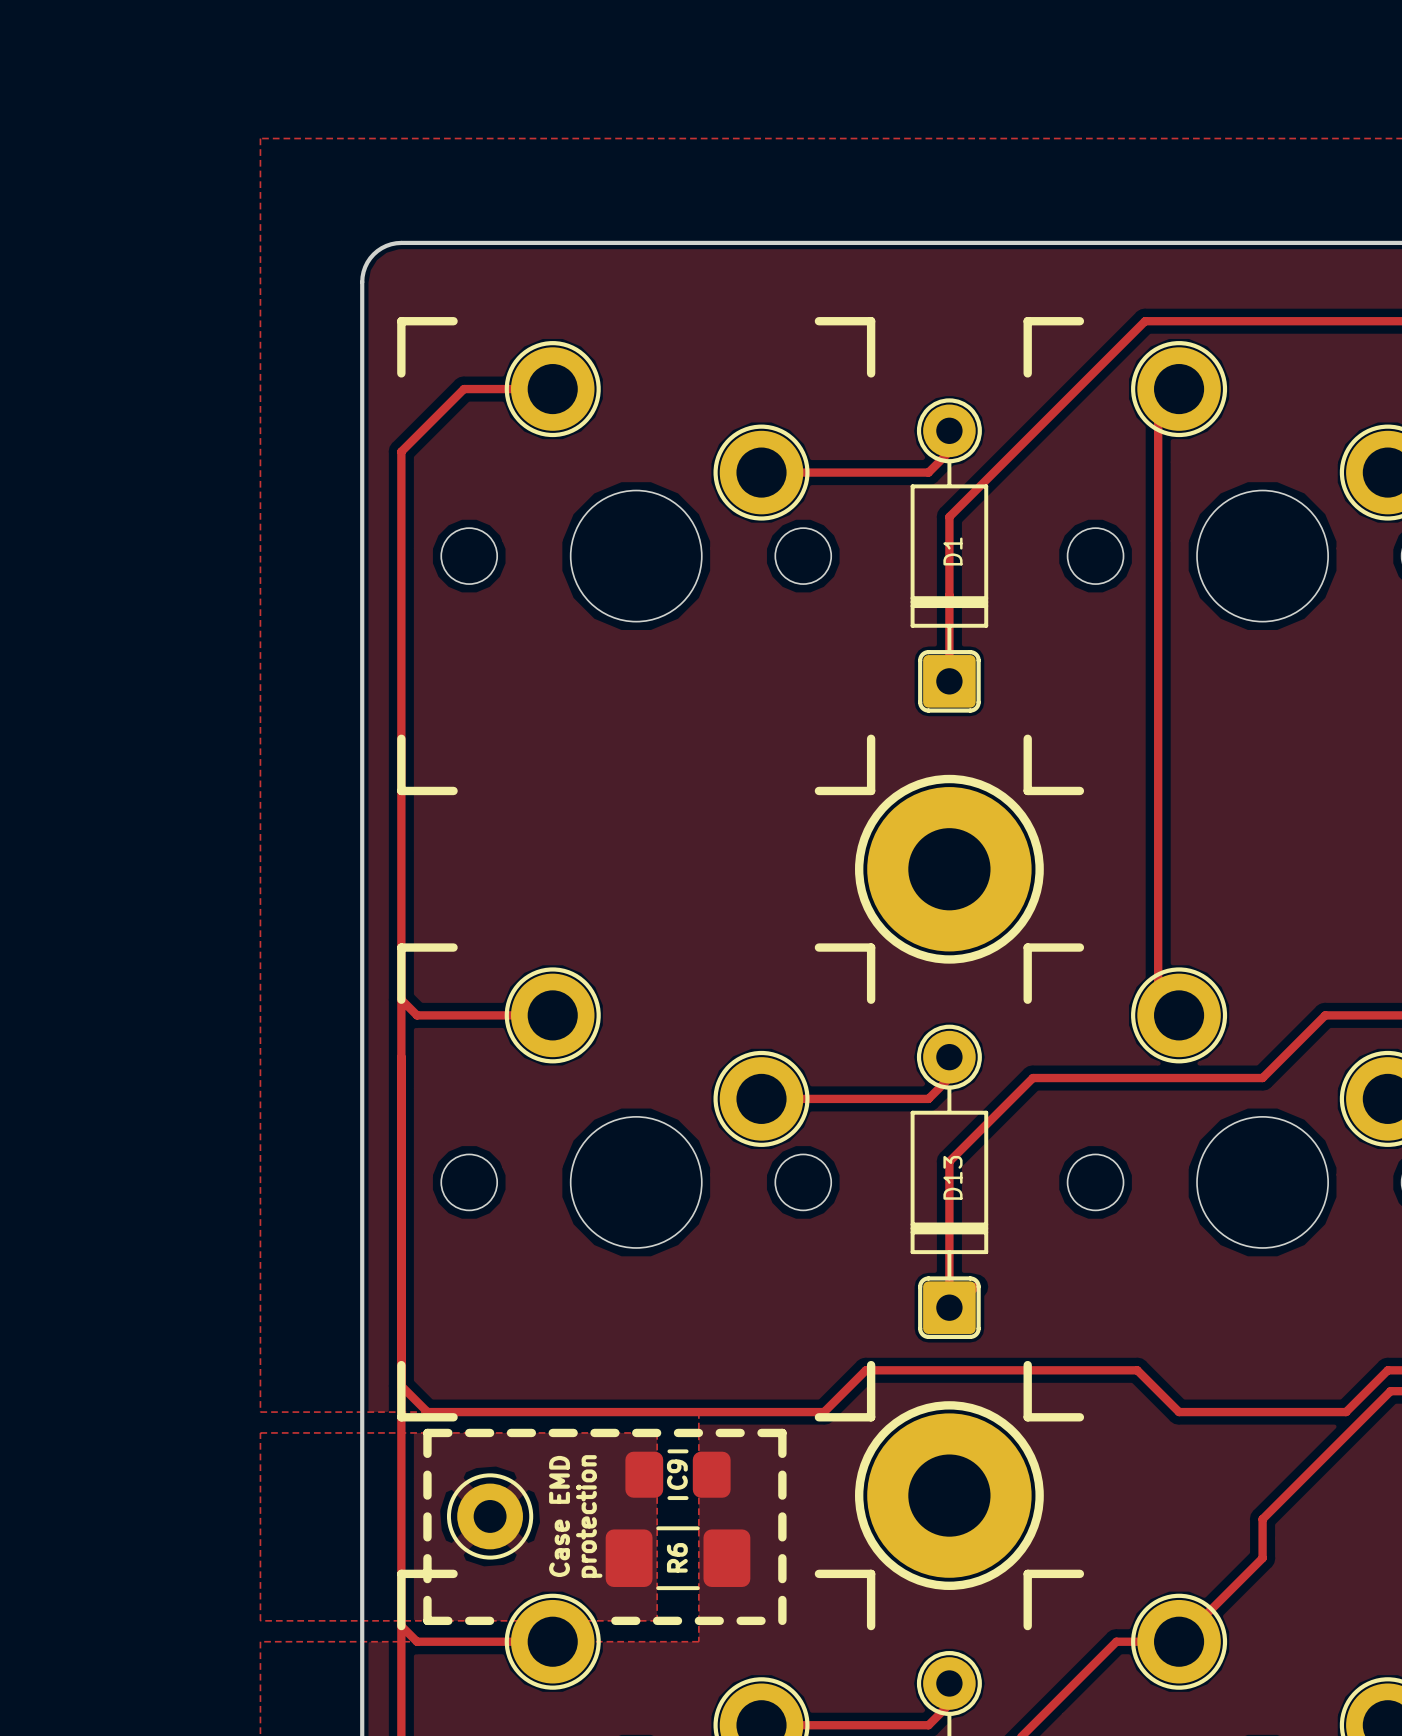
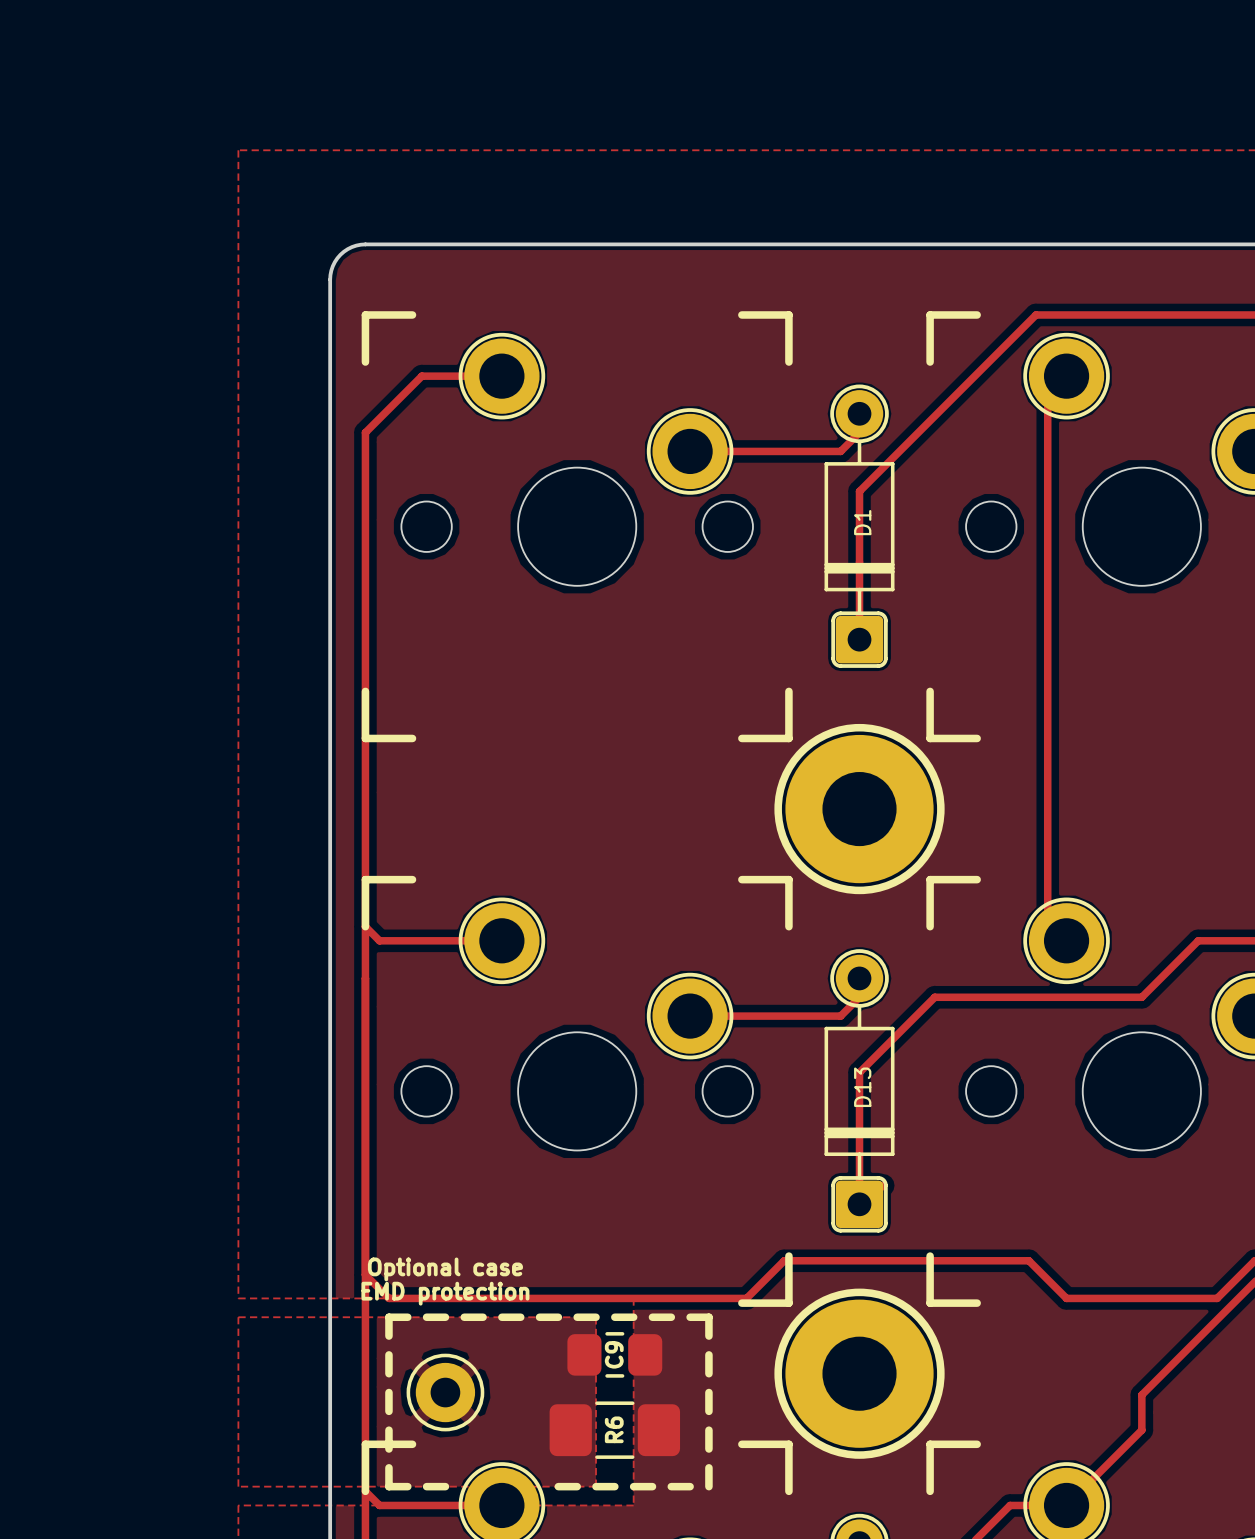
line: (401, 1365) (401, 1417) (453, 1417) -> none
text: none -> Optional case (445, 1269)
text: none -> EMD protection (445, 1293)
text: Case EMD (559, 1516) -> none
text: protection (589, 1516) -> none

